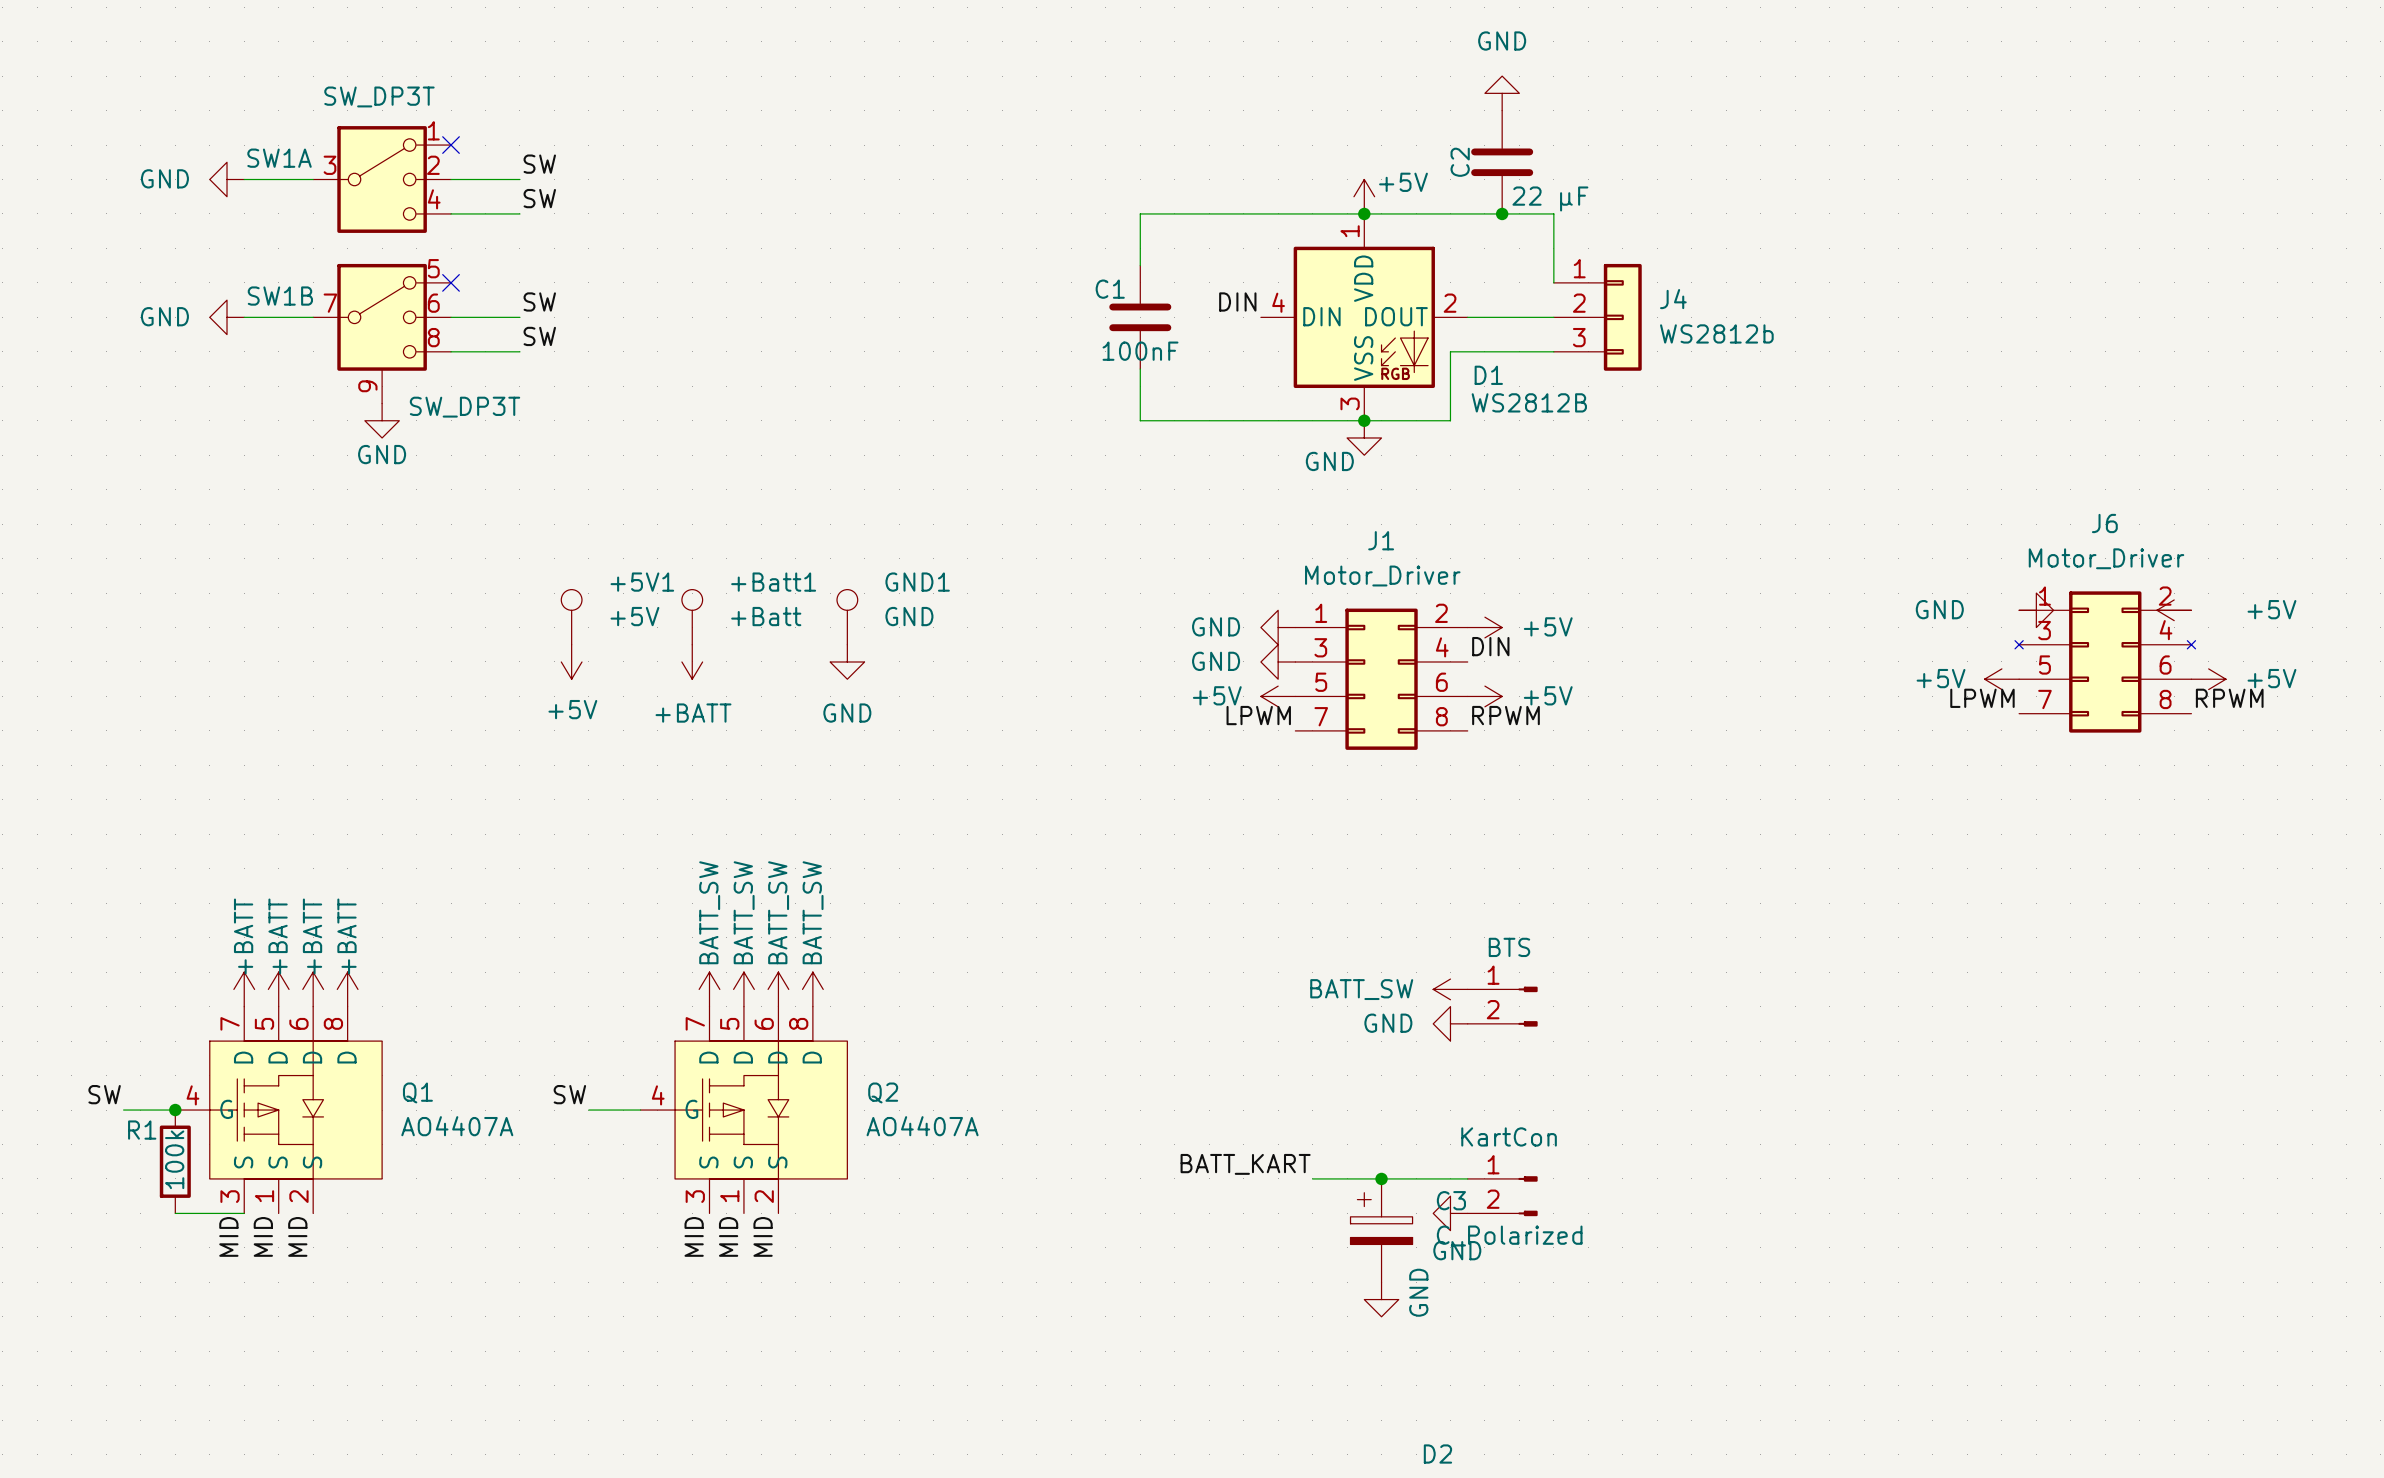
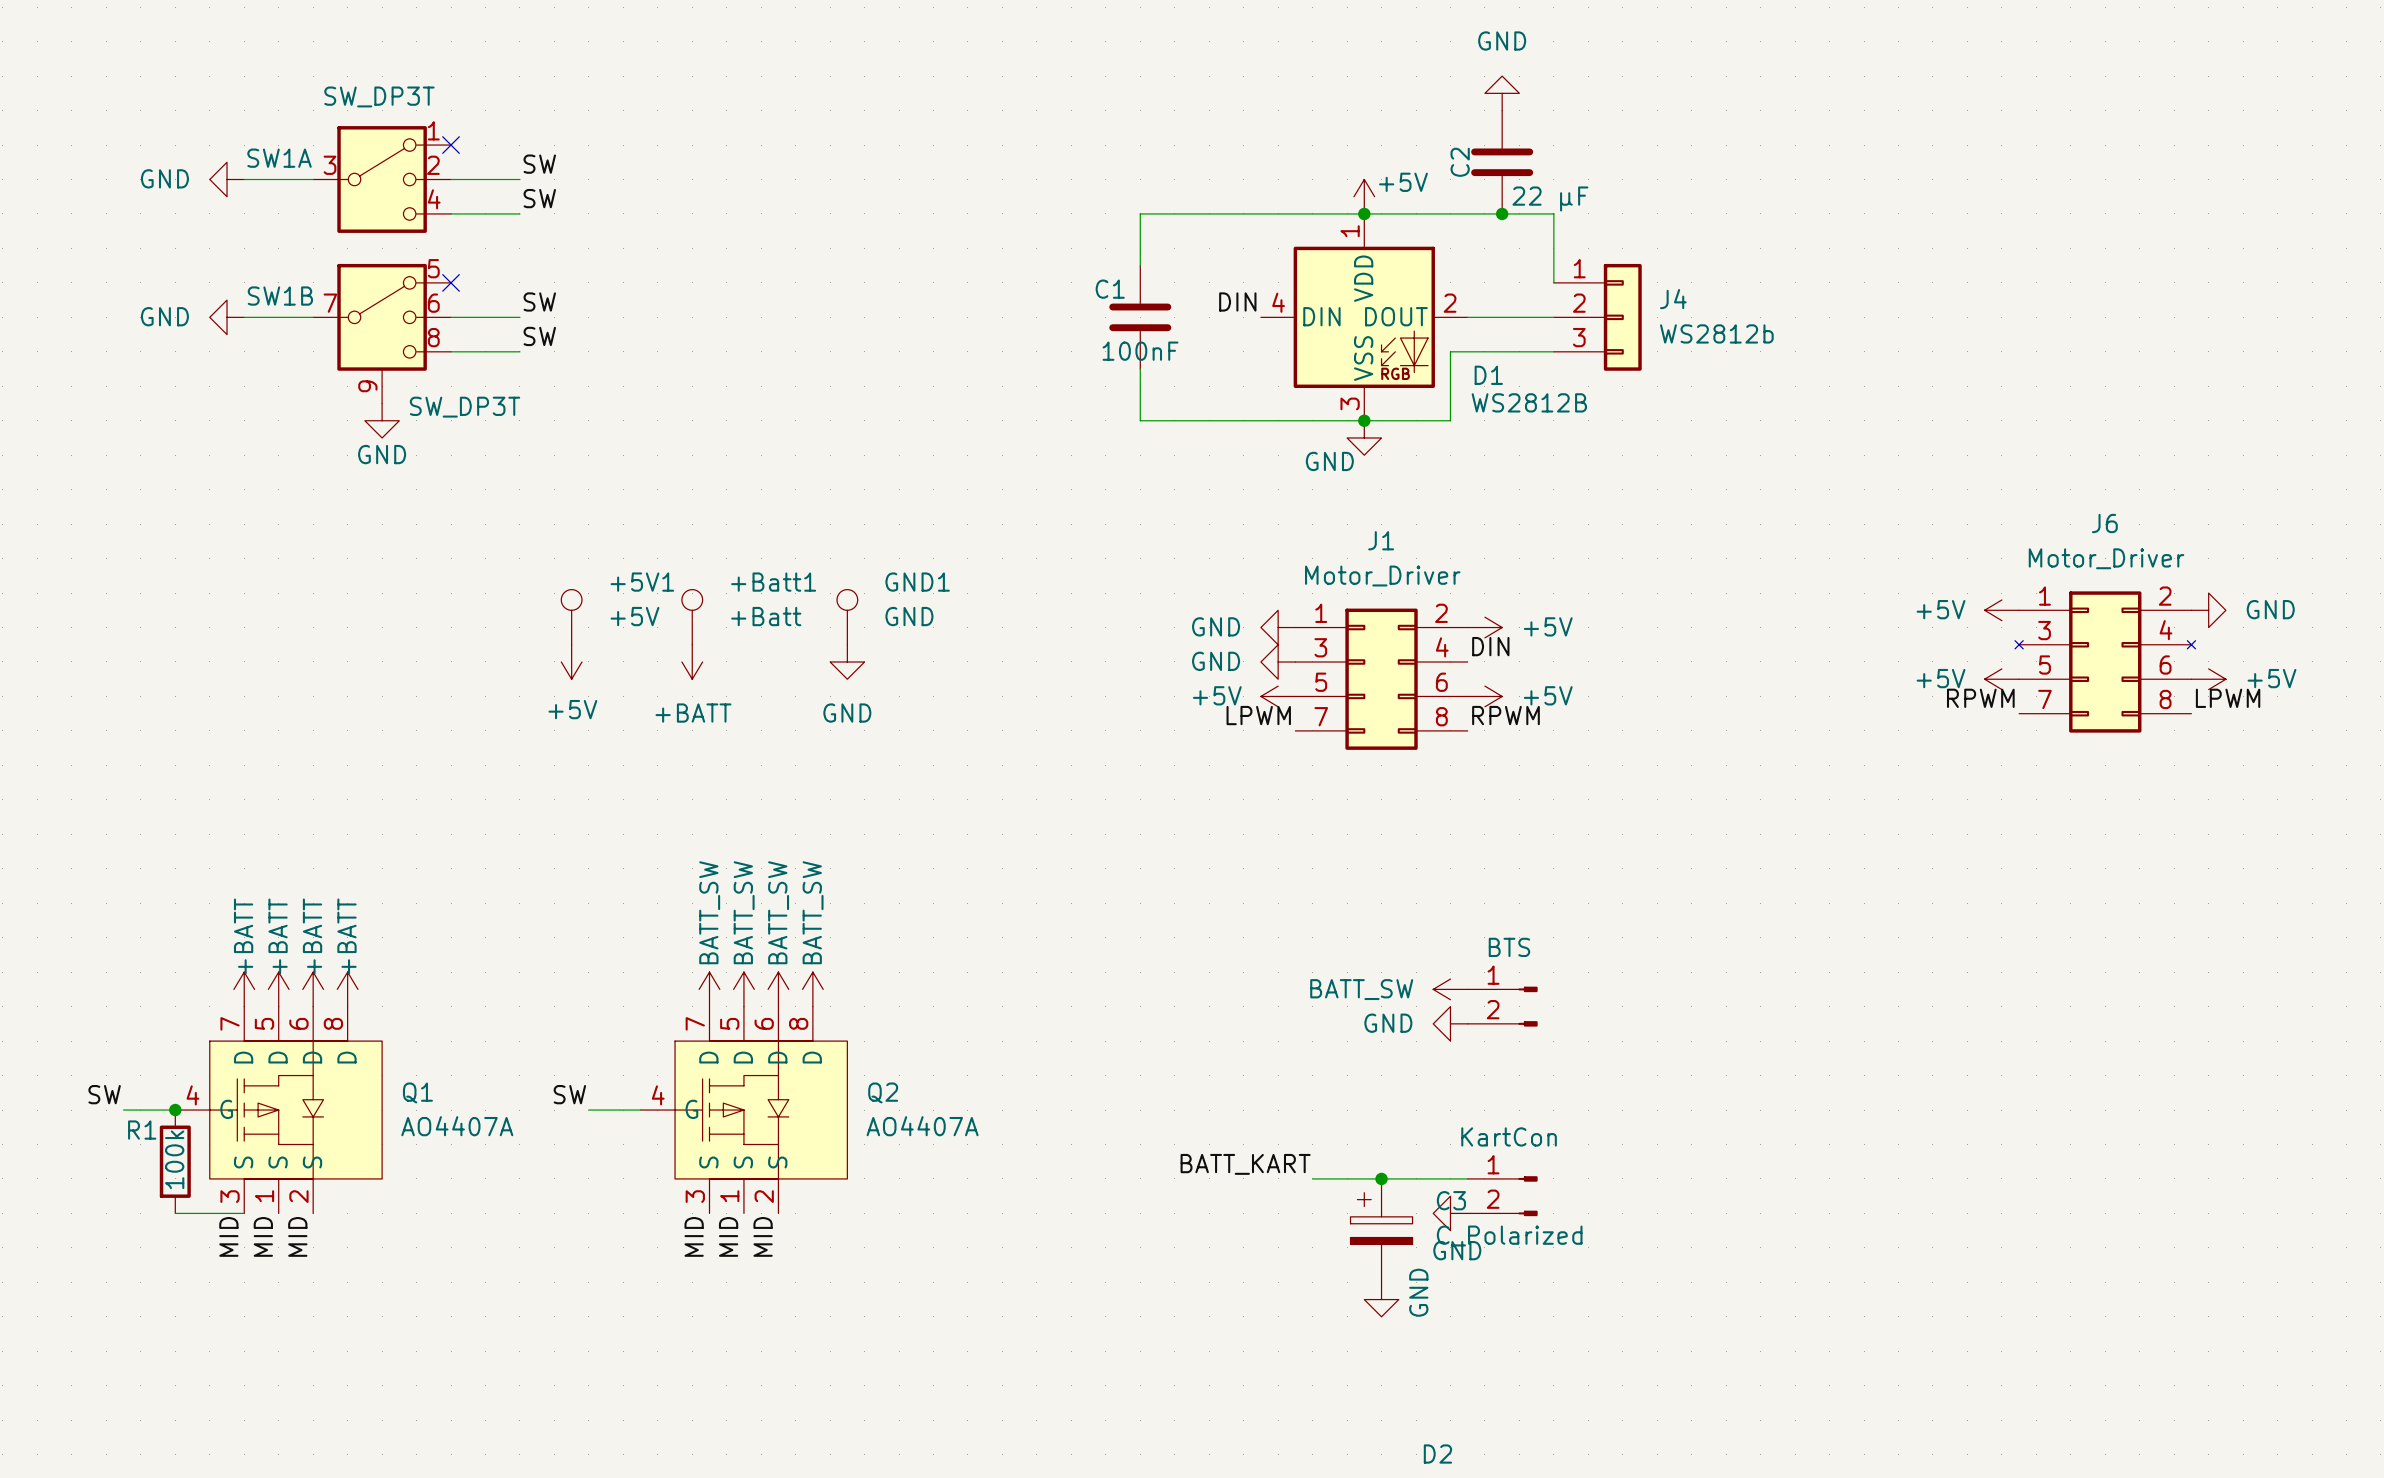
power symbol text position: GND (1939, 609) -> GND (2270, 609)
power symbol text position: +5V (2271, 609) -> +5V (1941, 609)
power symbol position: GND (2036, 610) -> GND (2208, 610)
power symbol position: +5V (2174, 610) -> +5V (2001, 610)
label: LPWM (1982, 698) -> RPWM (1980, 698)
label: RPWM (2229, 698) -> LPWM (2228, 698)

